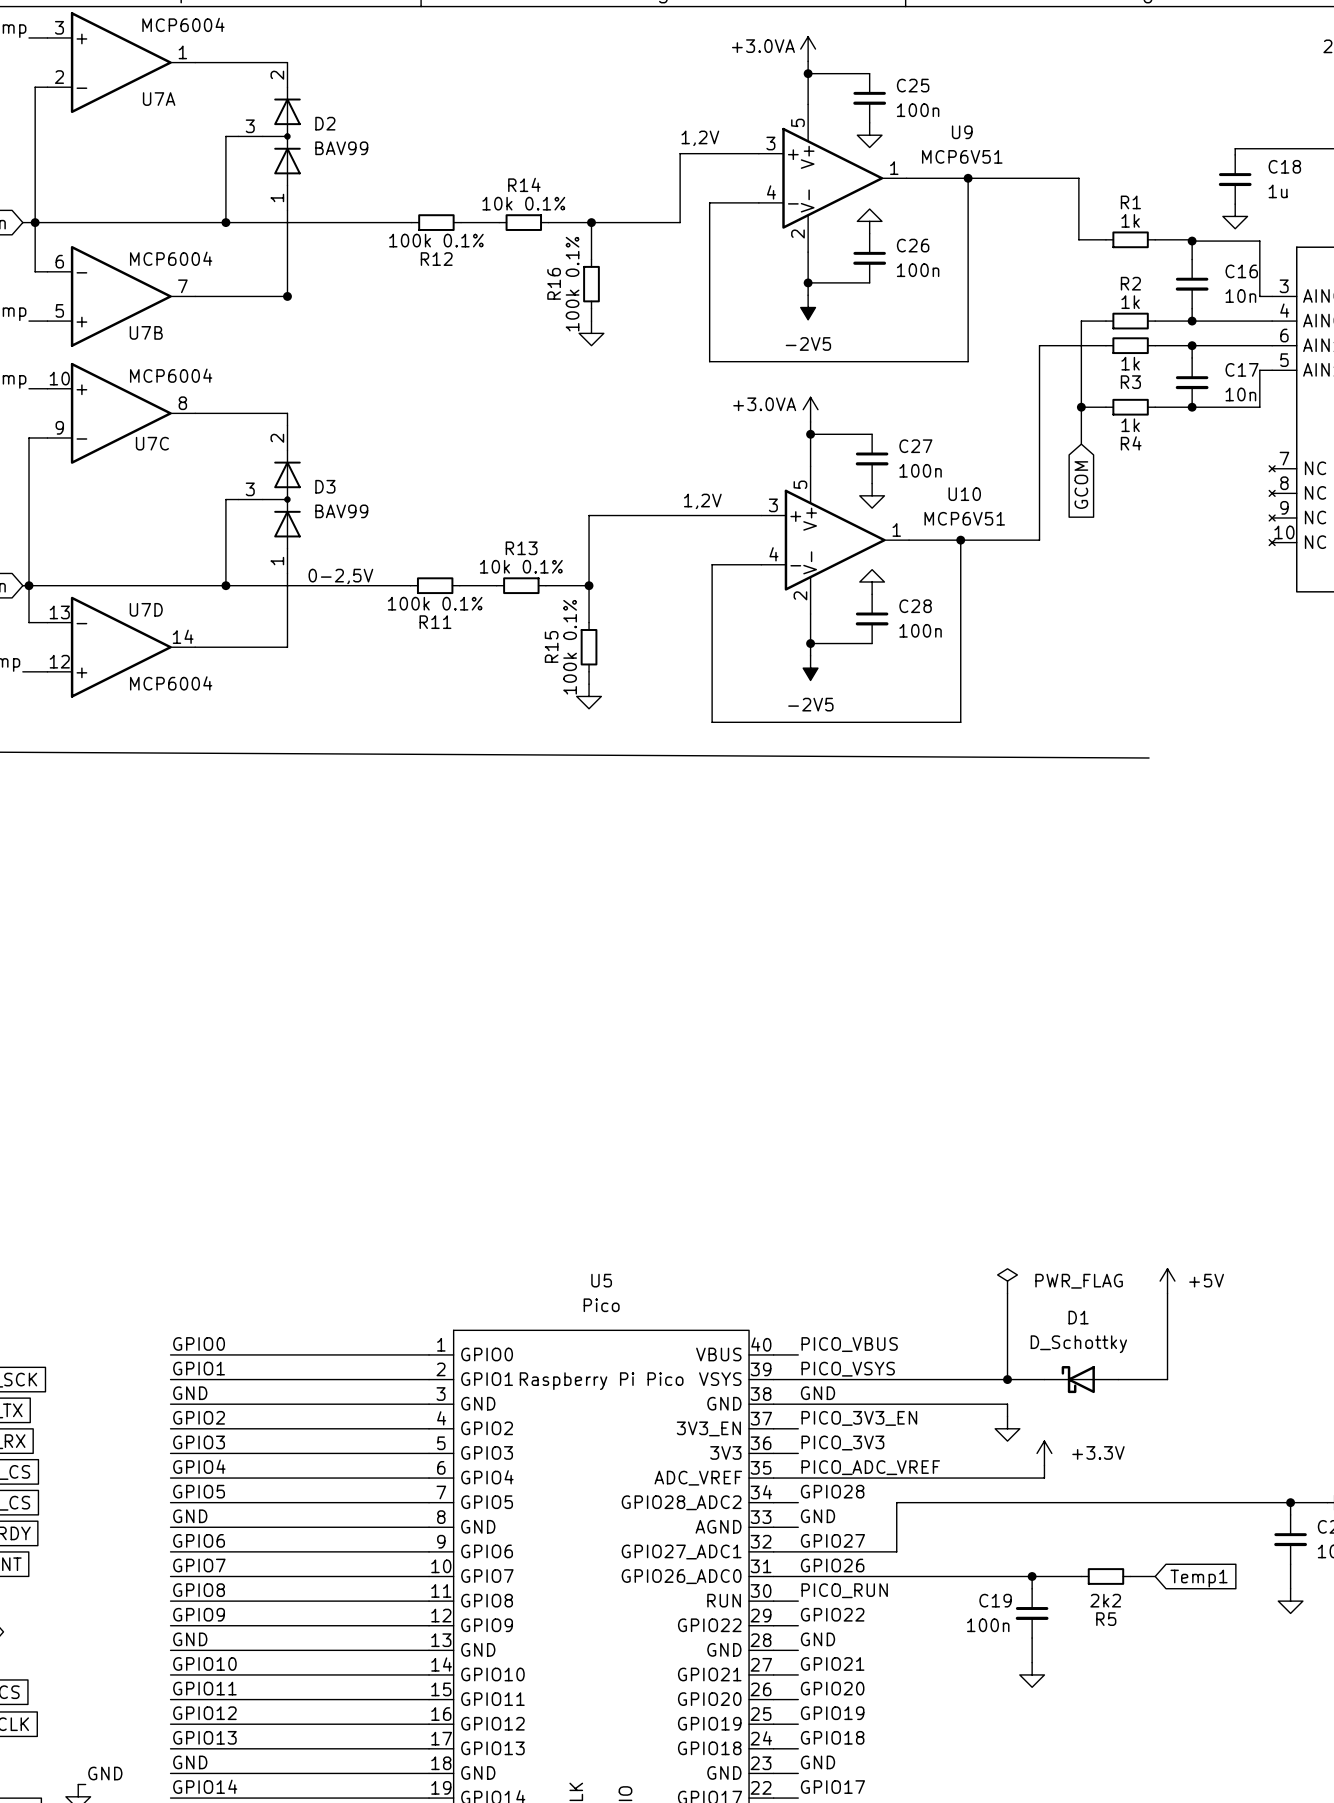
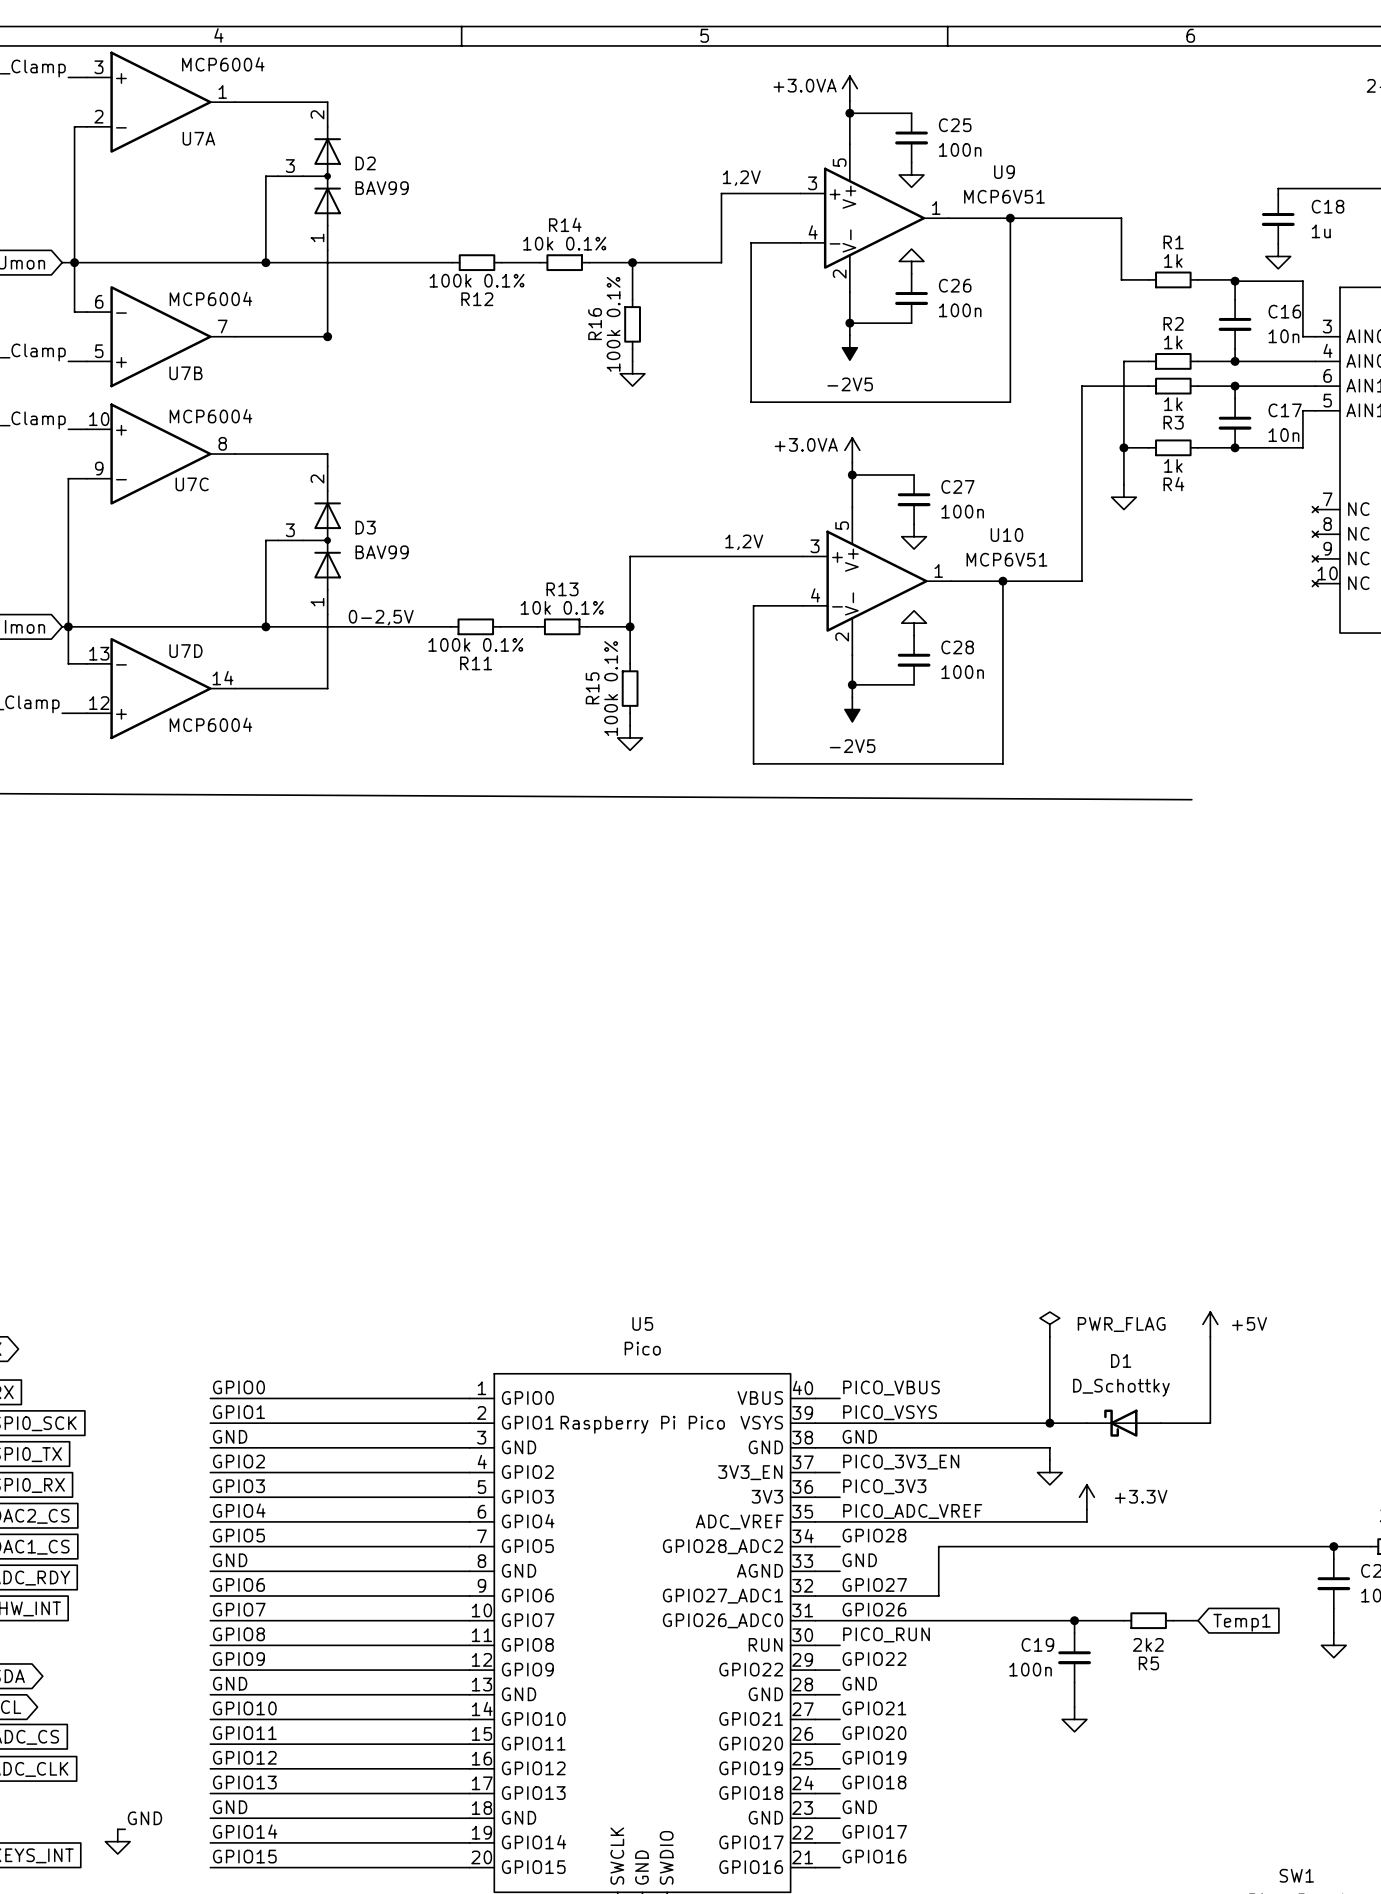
power symbol: none -> (1123, 497)
global label: GCOM (1081, 485) -> none

